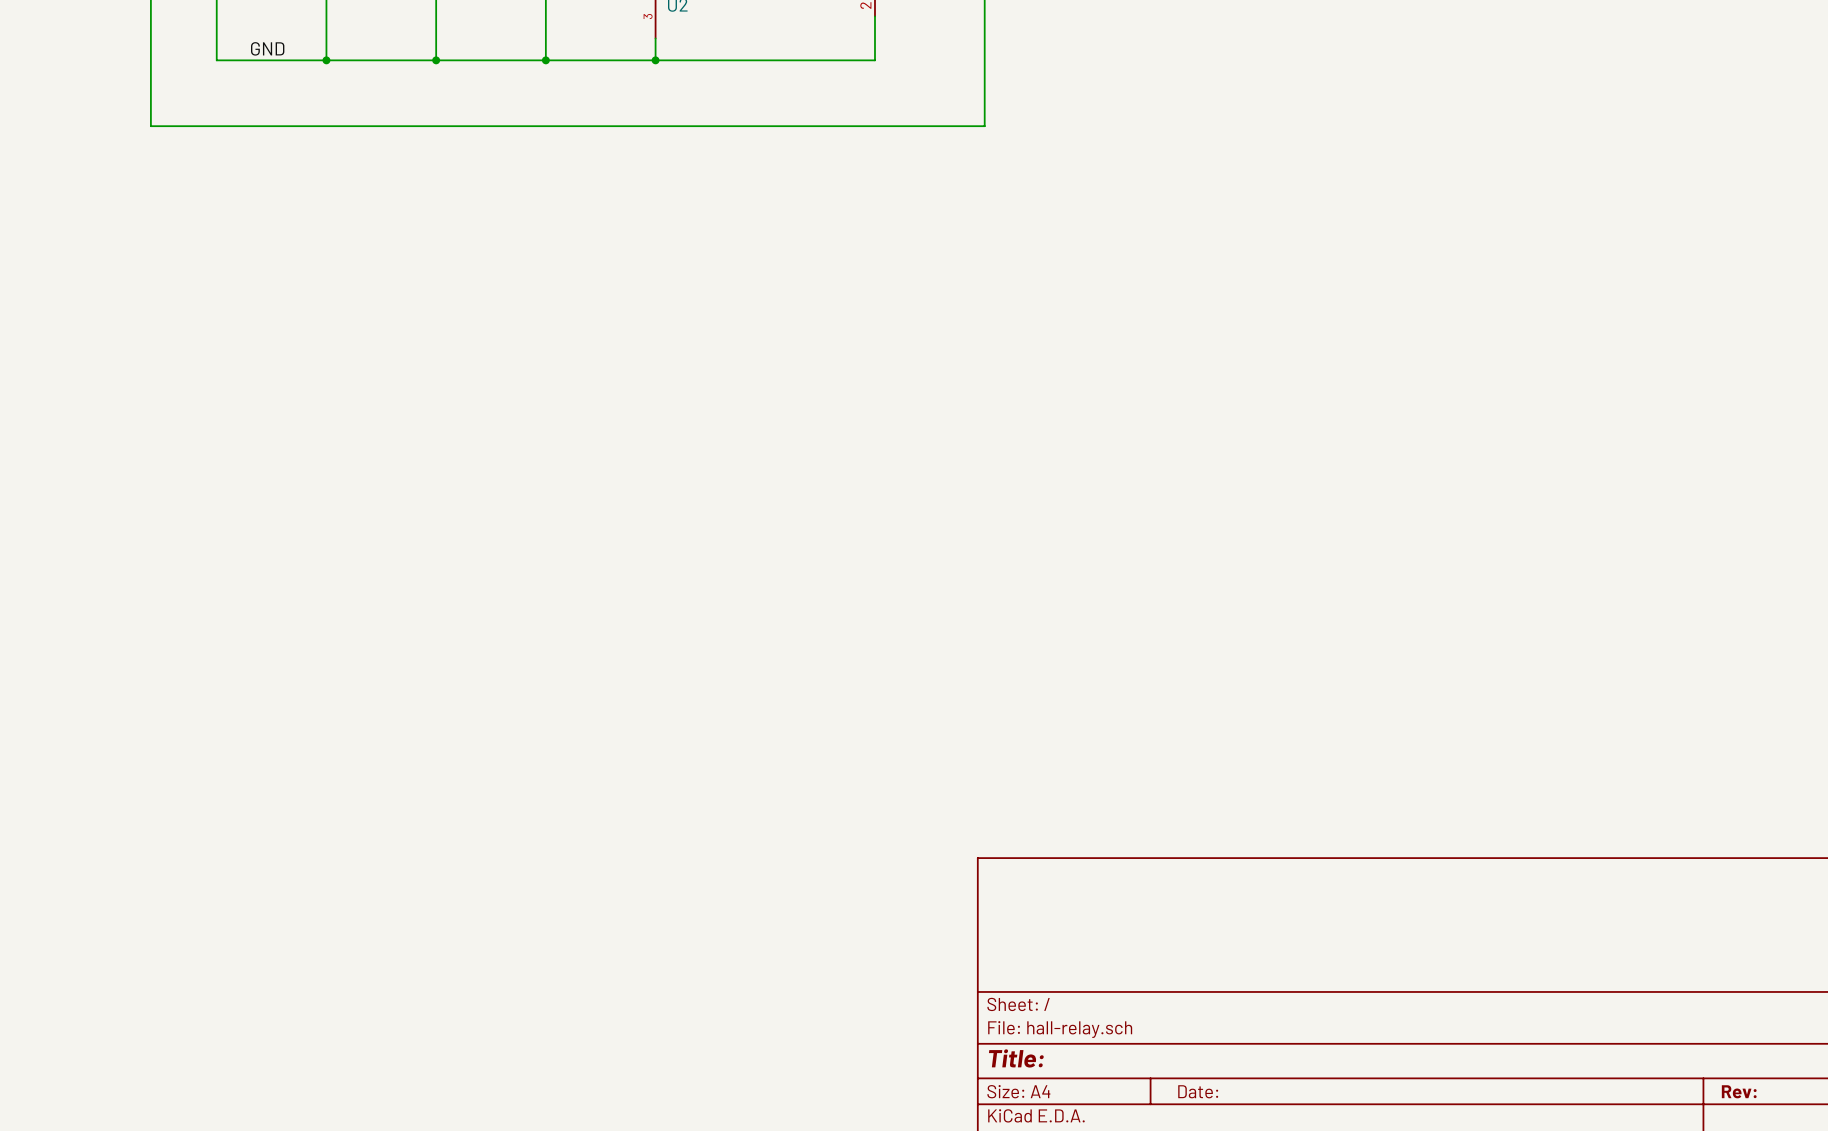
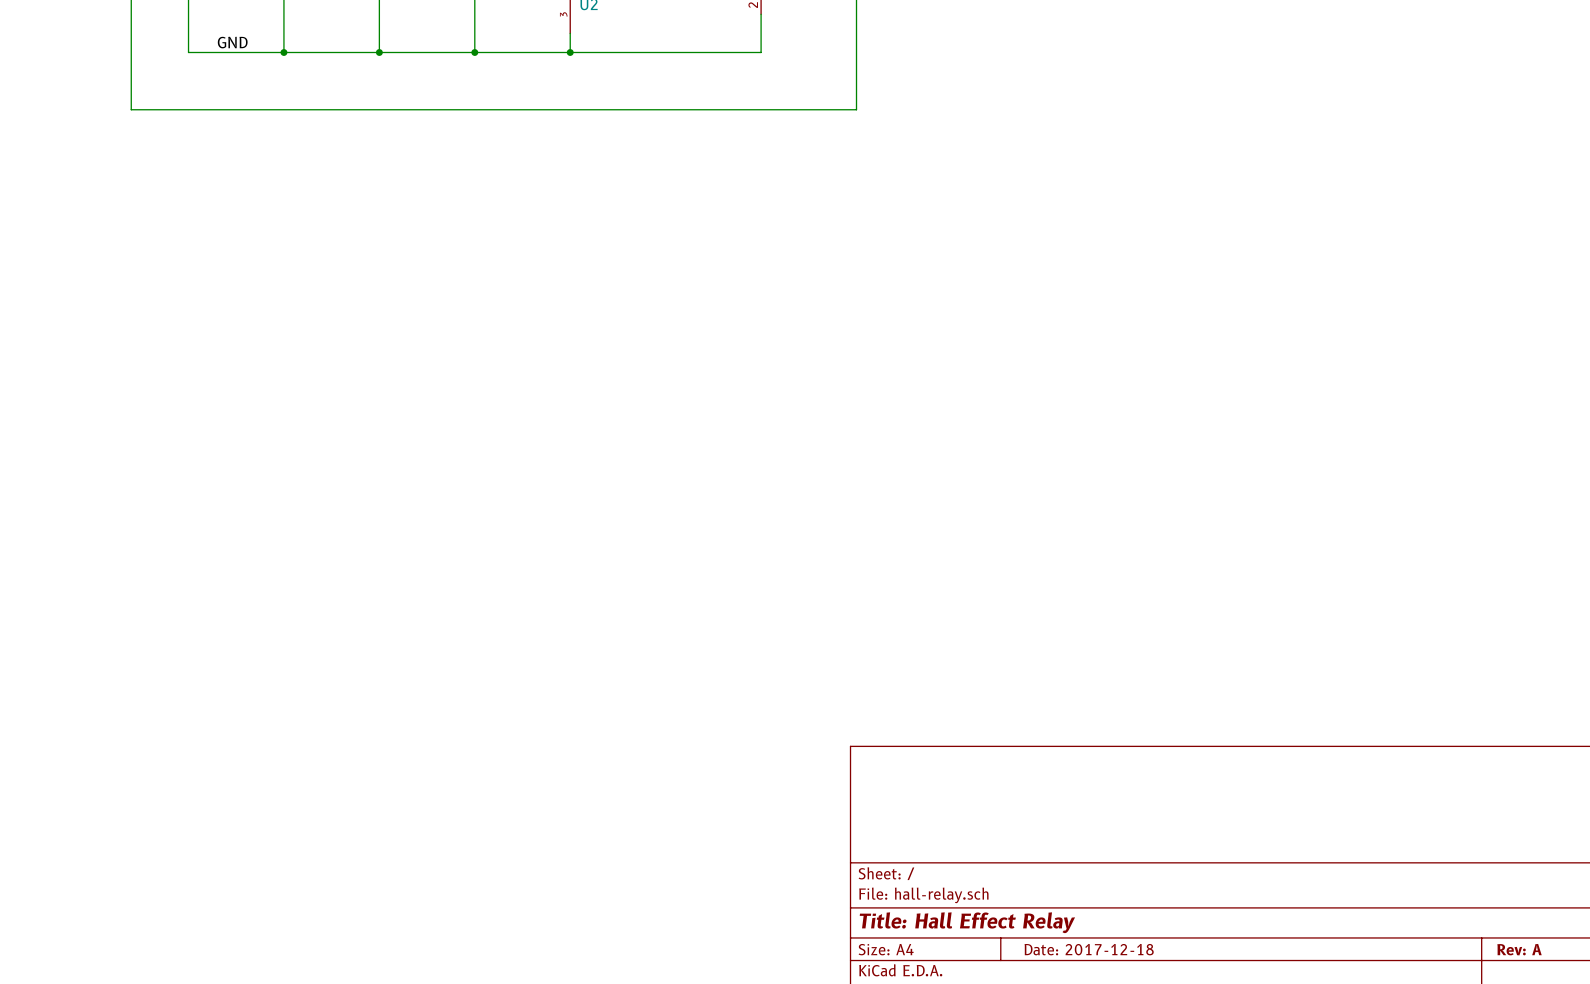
title block: Title: (1016, 1058) -> Title: Hall Effect Relay (967, 922)
title block: Date: (1198, 1091) -> Date: 2017-12-18 (1089, 949)
title block: Rev: (1739, 1091) -> Rev: A (1519, 949)

